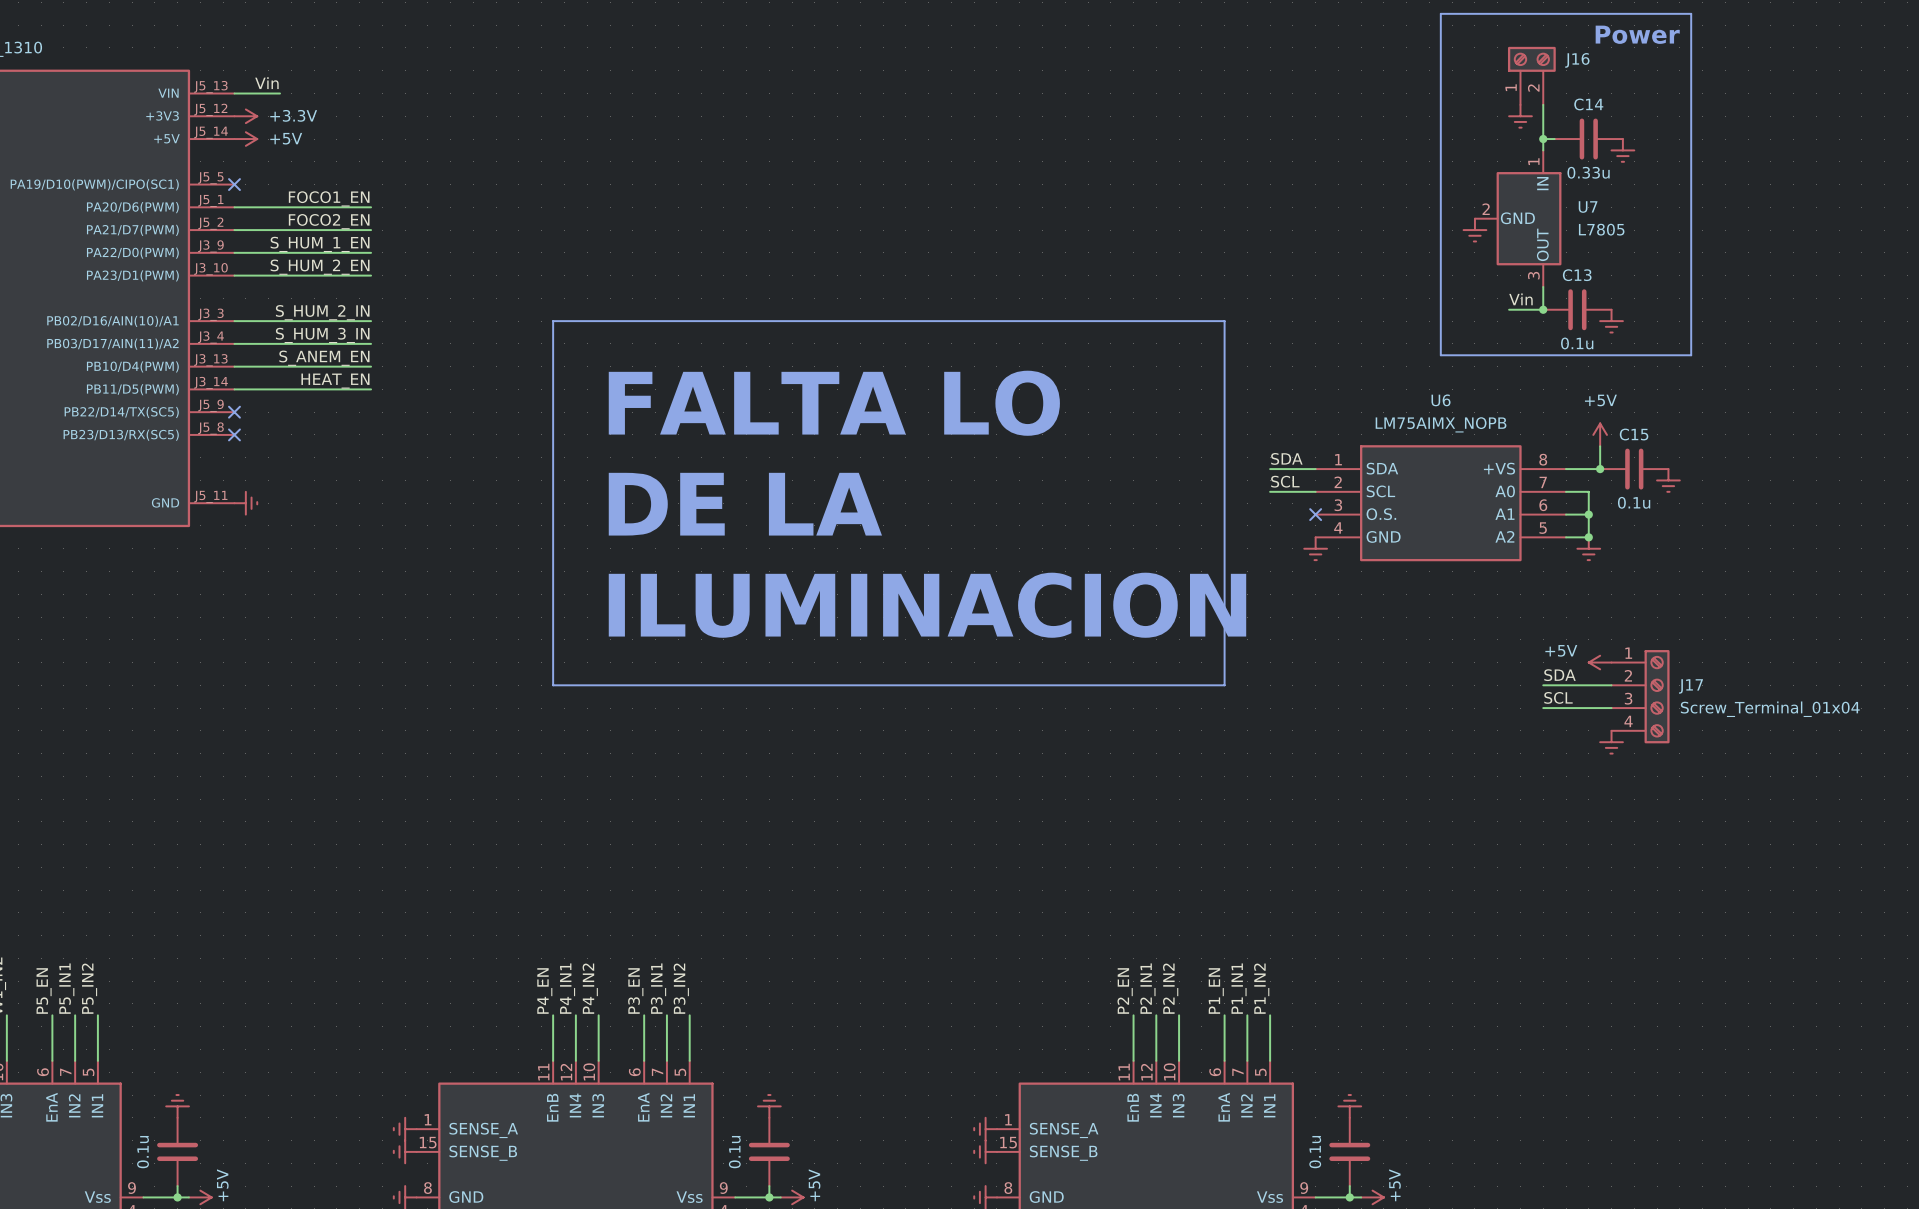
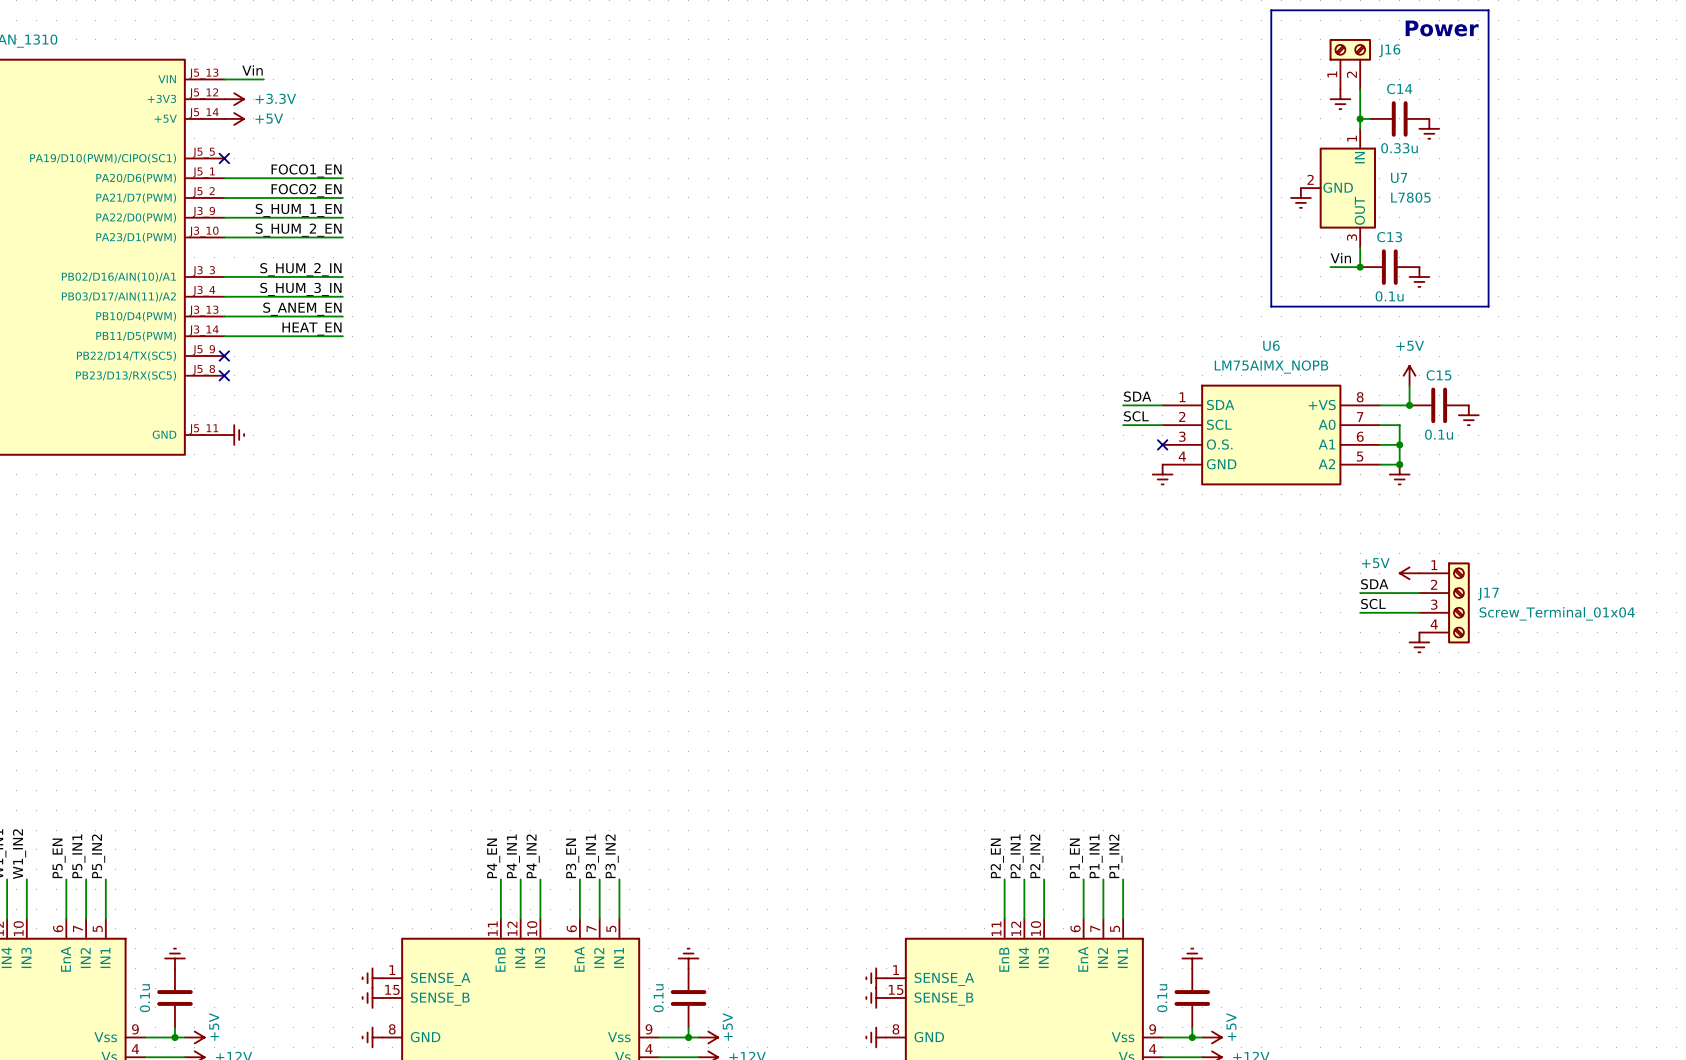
line: (553, 321) (1224, 321) (1224, 685) (553, 685) (553, 321) -> none
text: FALTA LO (834, 403) -> none
text: DE LA (745, 504) -> none
text: ILUMINACION (927, 605) -> none

